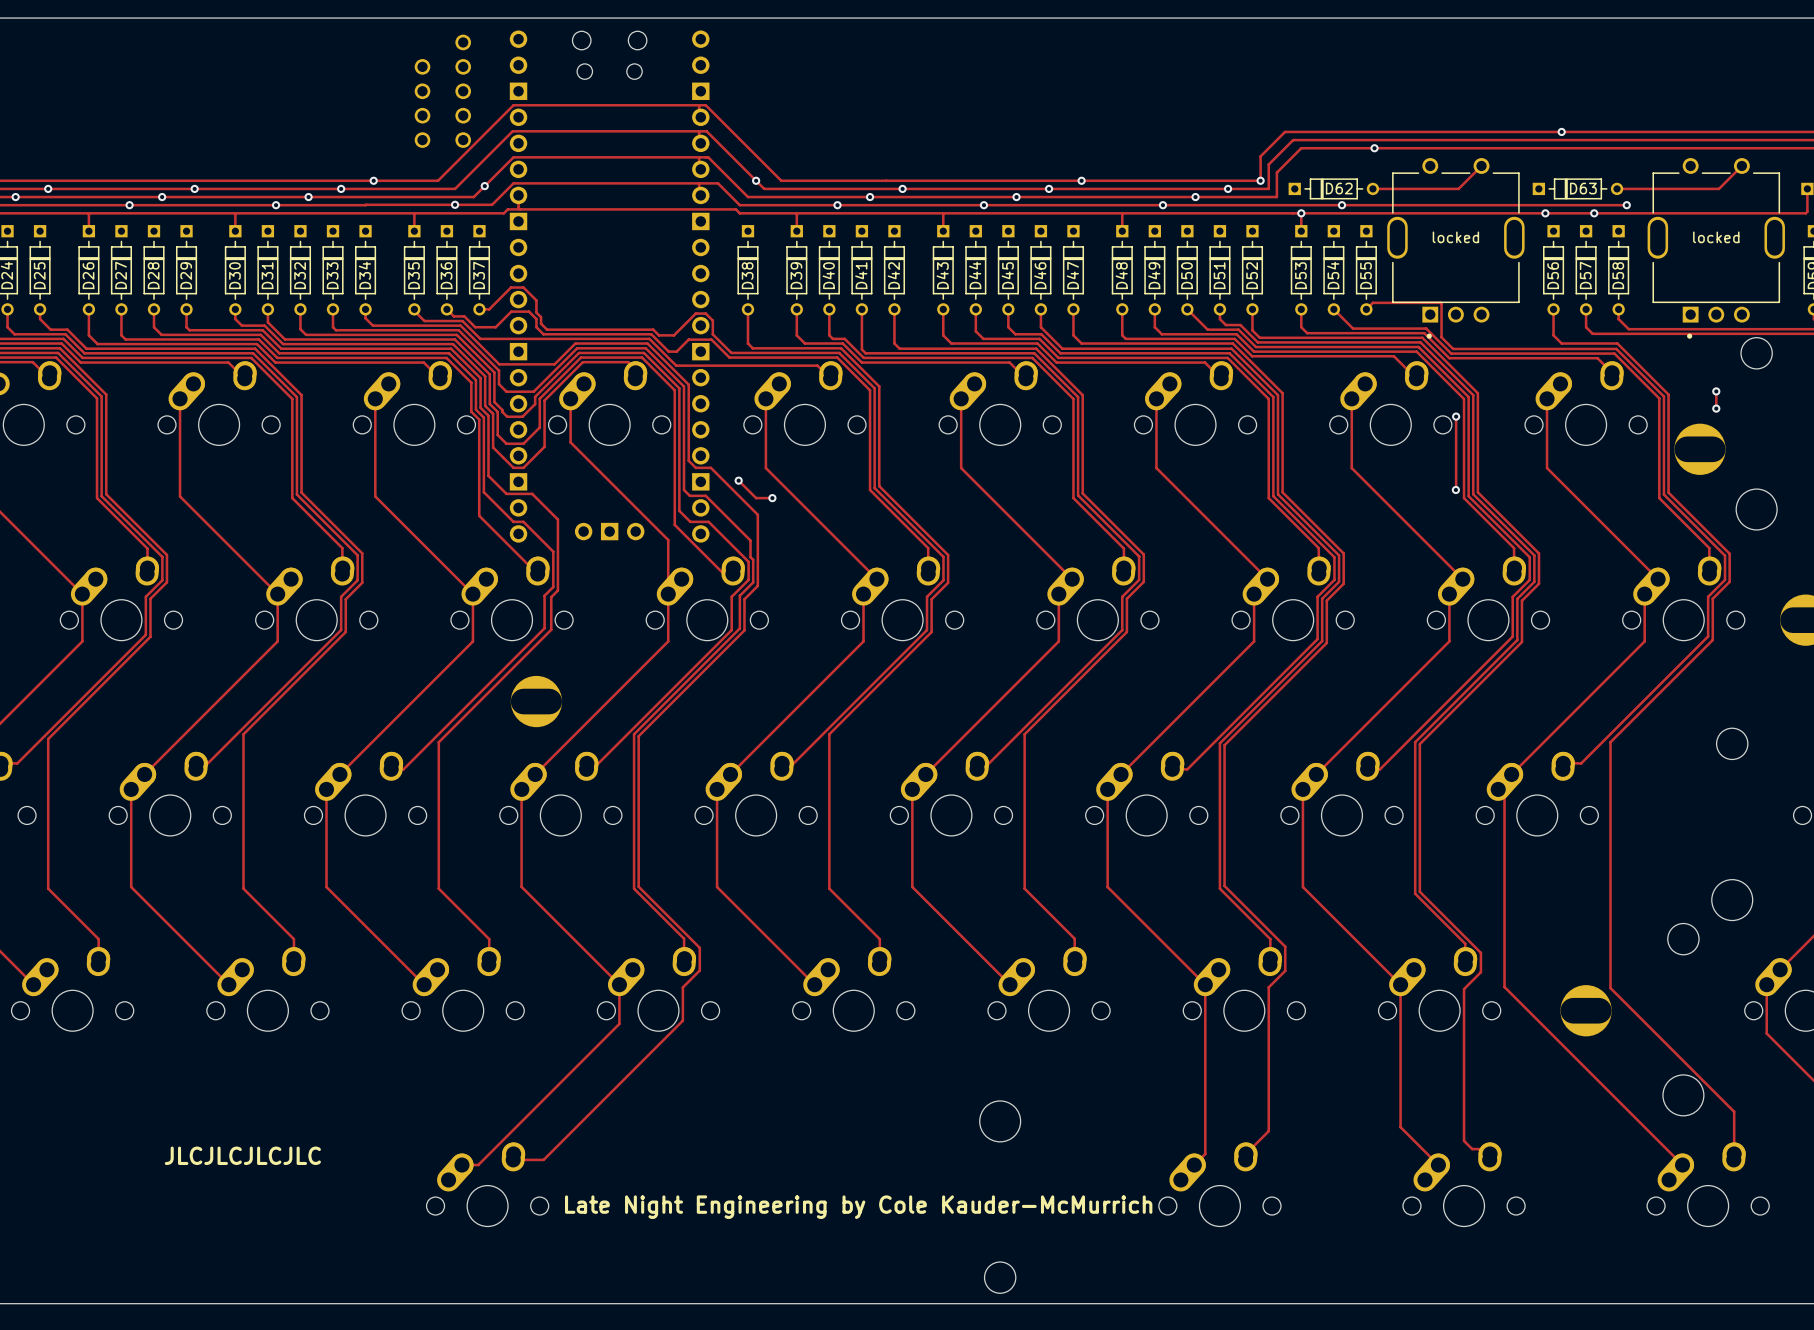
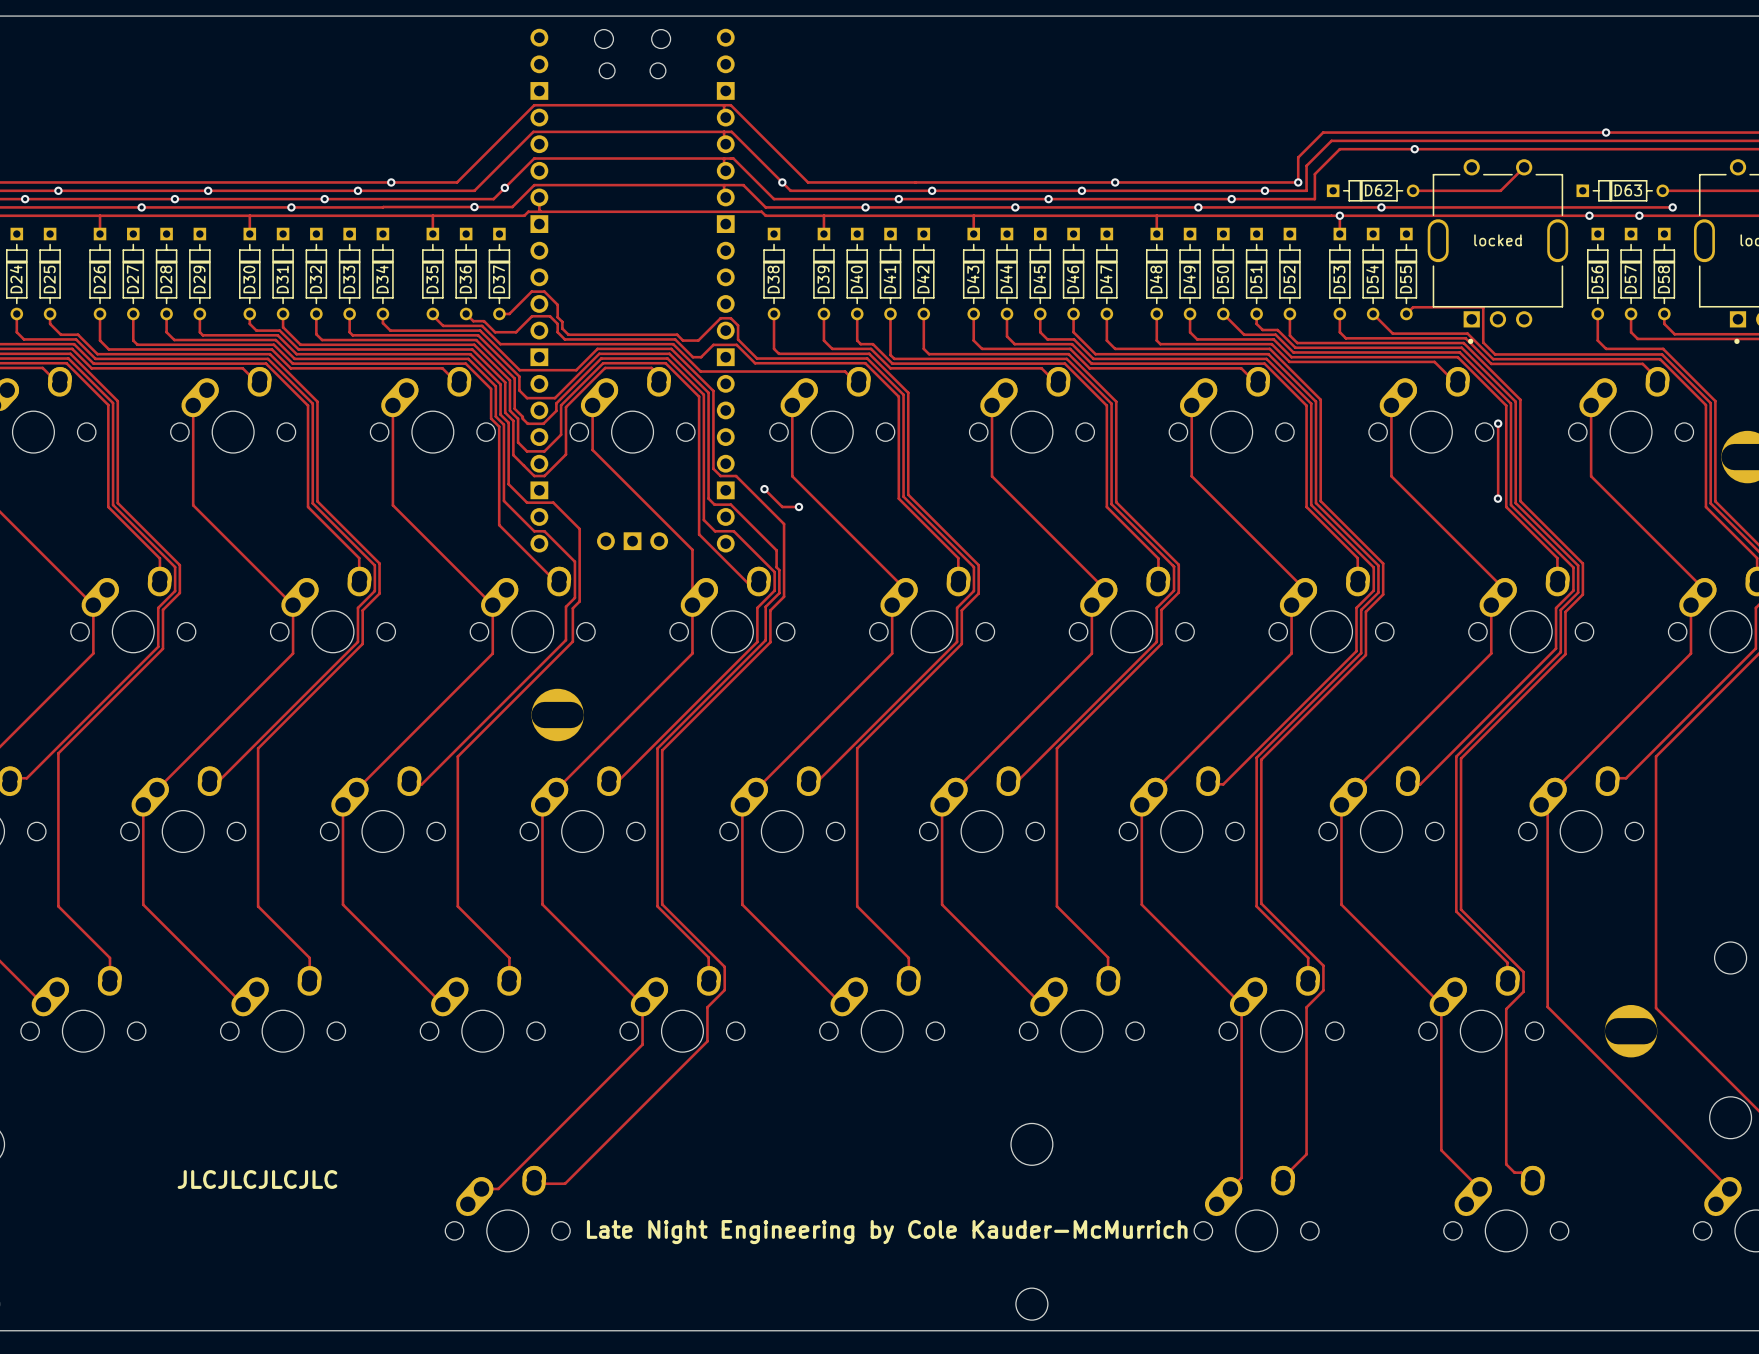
part: (463, 42) -> none
part: (422, 66) -> none
part: (463, 66) -> none
part: (422, 91) -> none
part: (463, 91) -> none
part: (422, 115) -> none
part: (463, 115) -> none
part: (422, 140) -> none
part: (463, 140) -> none

